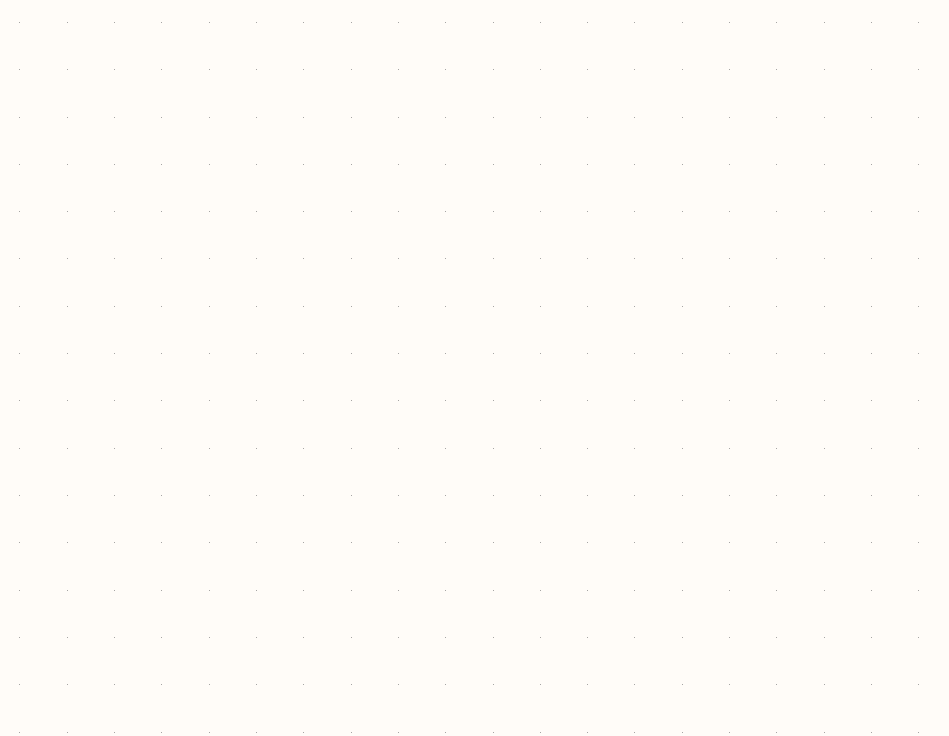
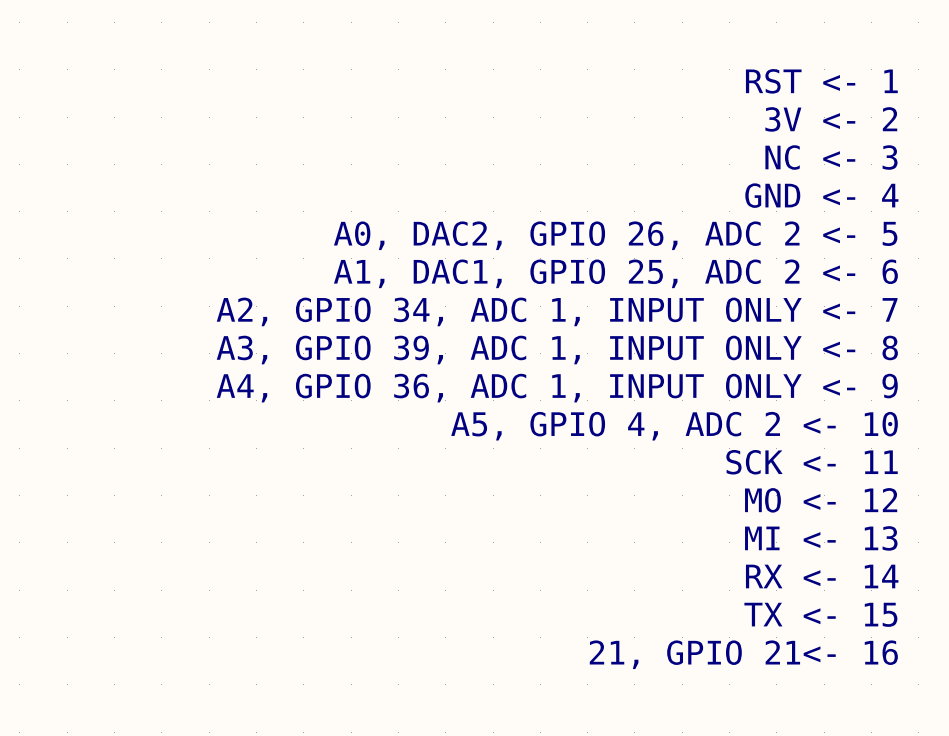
text: none -> RST <- 1 (821, 81)
text: none -> 3V <- 2 (831, 119)
text: none -> NC <- 3 (831, 157)
text: none -> GND <- 4 (821, 195)
text: none -> A0, DAC2, GPIO 26, ADC 2 <- 5 (615, 235)
text: none -> A1, DAC1, GPIO 25, ADC 2 <- 6 (615, 273)
text: none -> A2, GPIO 34, ADC 1, INPUT ONLY <- 7 (557, 311)
text: none -> A3, GPIO 39, ADC 1, INPUT ONLY <- 8 (557, 350)
text: none -> A4, GPIO 36, ADC 1, INPUT ONLY <- 9 (557, 388)
text: none -> A5, GPIO 4, ADC 2 <- 10 (674, 426)
text: none -> SCK <- 11 (812, 462)
text: none -> MO <- 12 (821, 500)
text: none -> MI <- 13 (821, 538)
text: none -> RX <- 14 (822, 576)
text: none -> TX <- 15 (820, 614)
text: none -> 21, GPIO 21<- 16 (743, 654)

